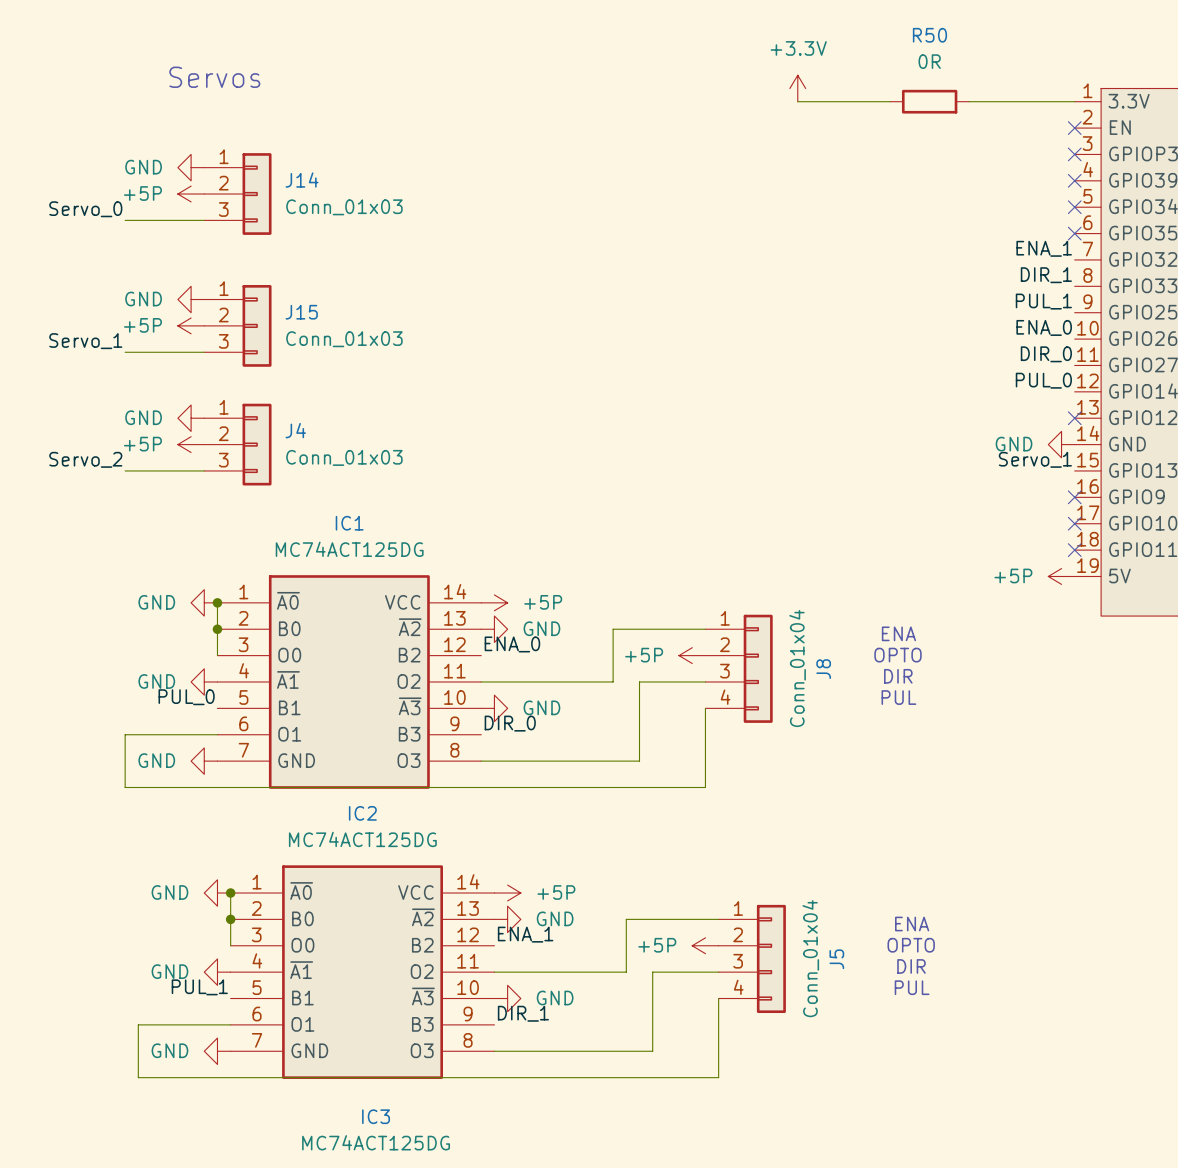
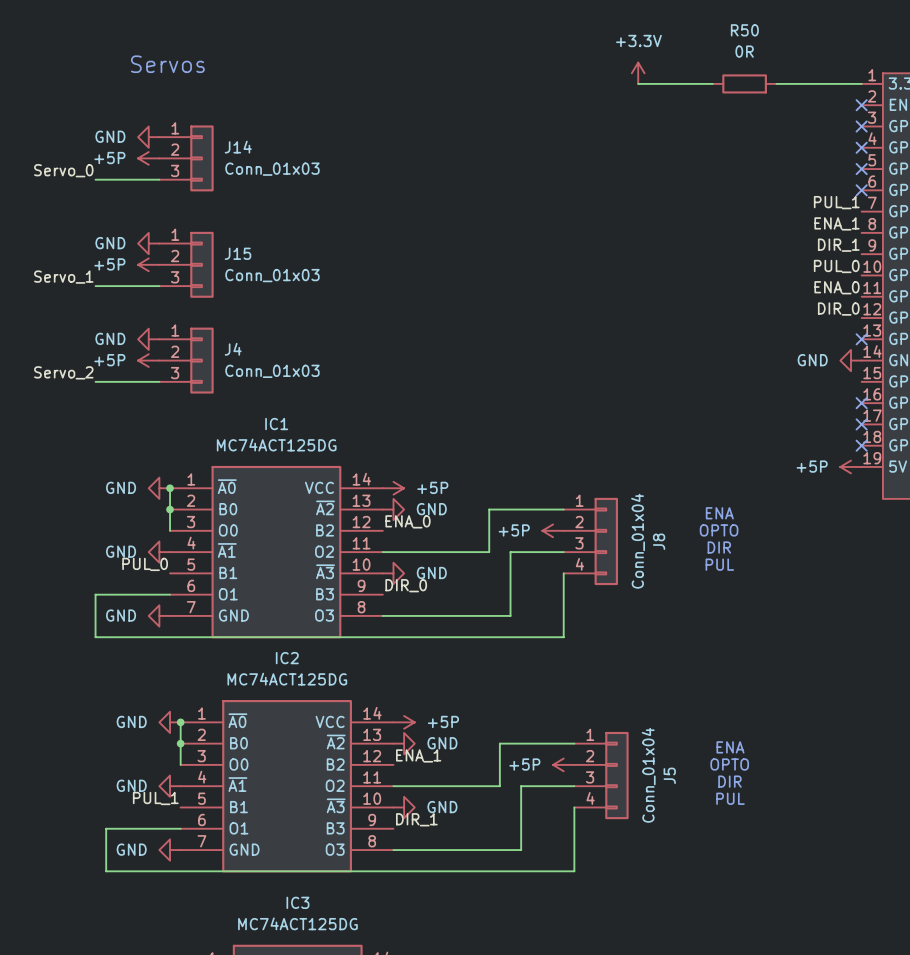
label: ENA_1 (1044, 248) -> PUL_1 (836, 202)
label: DIR_1 (1046, 275) -> ENA_1 (836, 223)
label: PUL_1 (1043, 301) -> DIR_1 (838, 245)
label: ENA_0 (1044, 327) -> PUL_0 (836, 266)
label: DIR_0 (1046, 354) -> ENA_0 (836, 287)
label: PUL_0 (1043, 380) -> DIR_0 (838, 309)
label: Servo_1 (1035, 459) -> none

